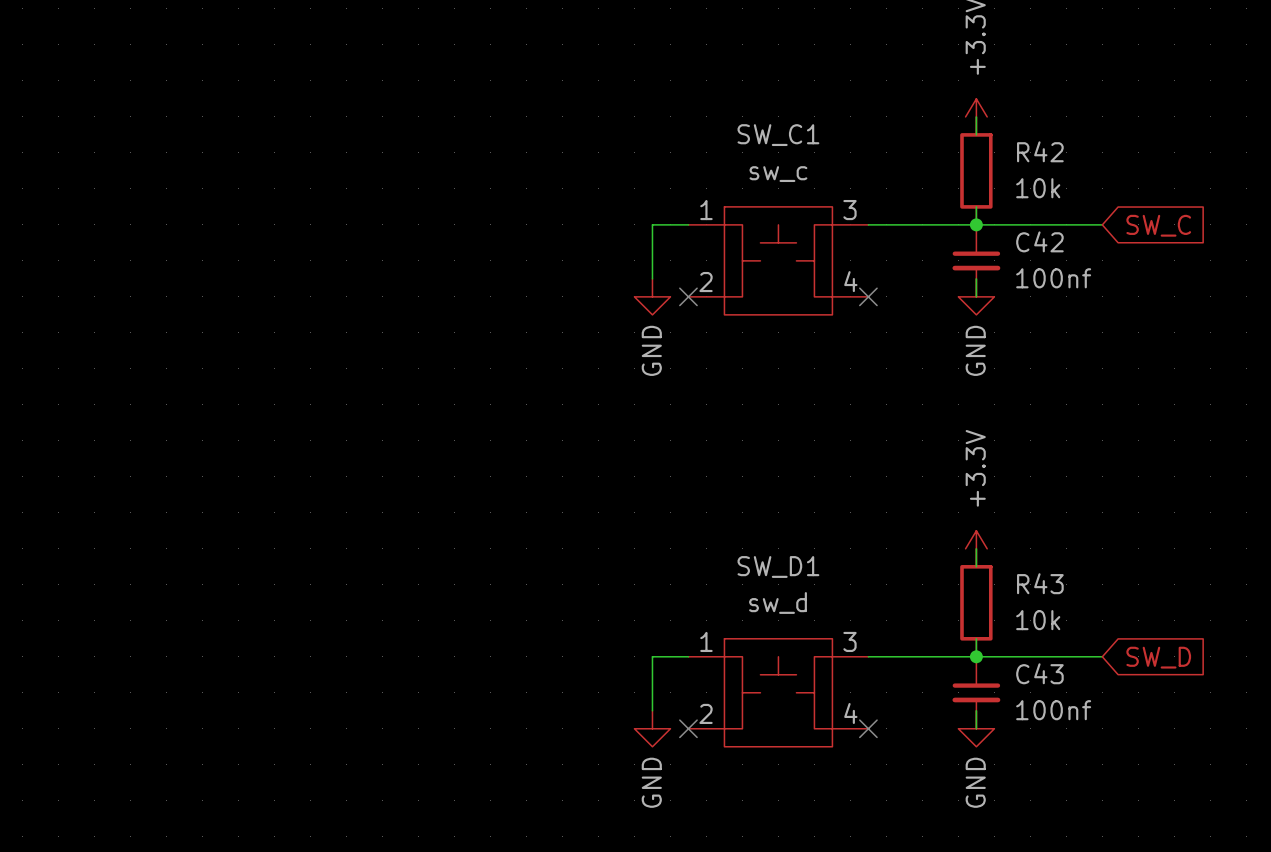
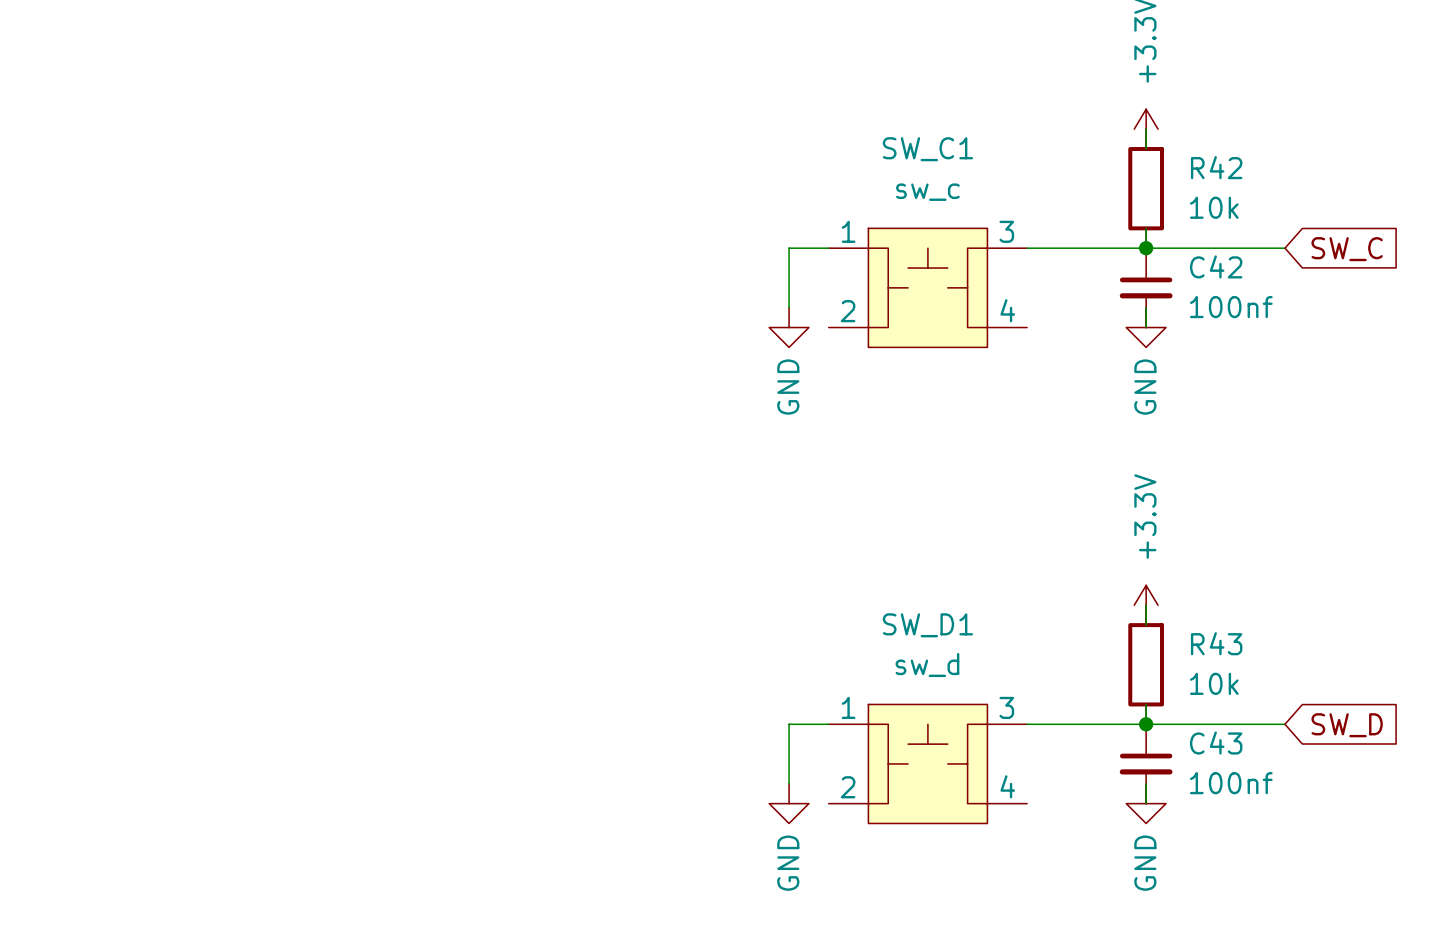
no-connect mark: (688, 296) -> none
no-connect mark: (868, 296) -> none
no-connect mark: (688, 728) -> none
no-connect mark: (868, 728) -> none

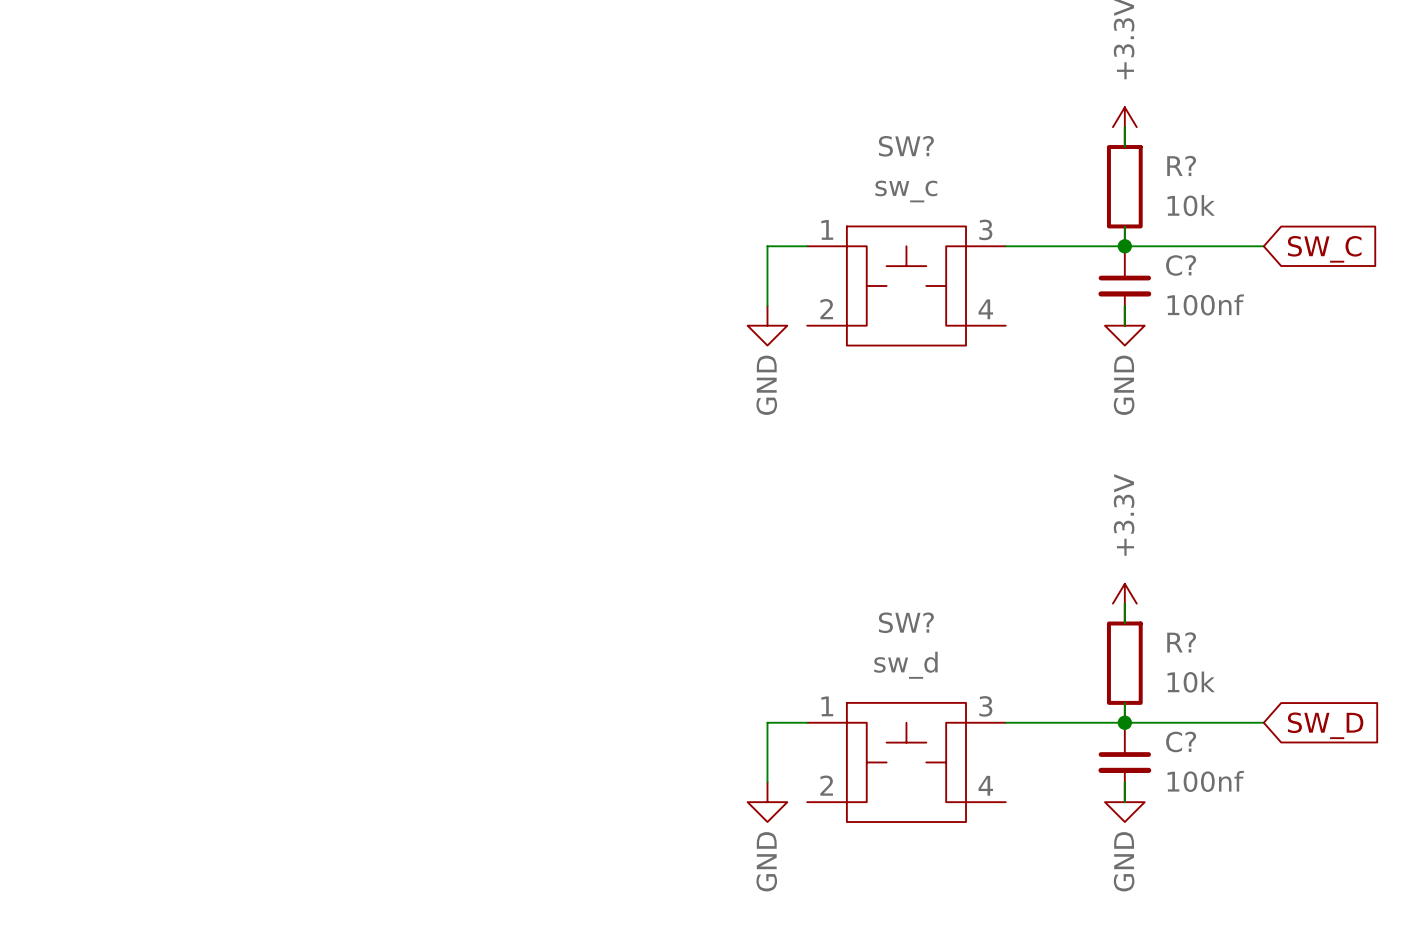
SW_C1 name: SW_C1 (927, 149) -> SW? (906, 146)
R42 name: R42 (1216, 167) -> R? (1181, 165)
C42 name: C42 (1216, 266) -> C? (1181, 265)
SW_D1 name: SW_D1 (927, 625) -> SW? (906, 622)
R43 name: R43 (1216, 643) -> R? (1181, 642)
C43 name: C43 (1216, 743) -> C? (1181, 741)

